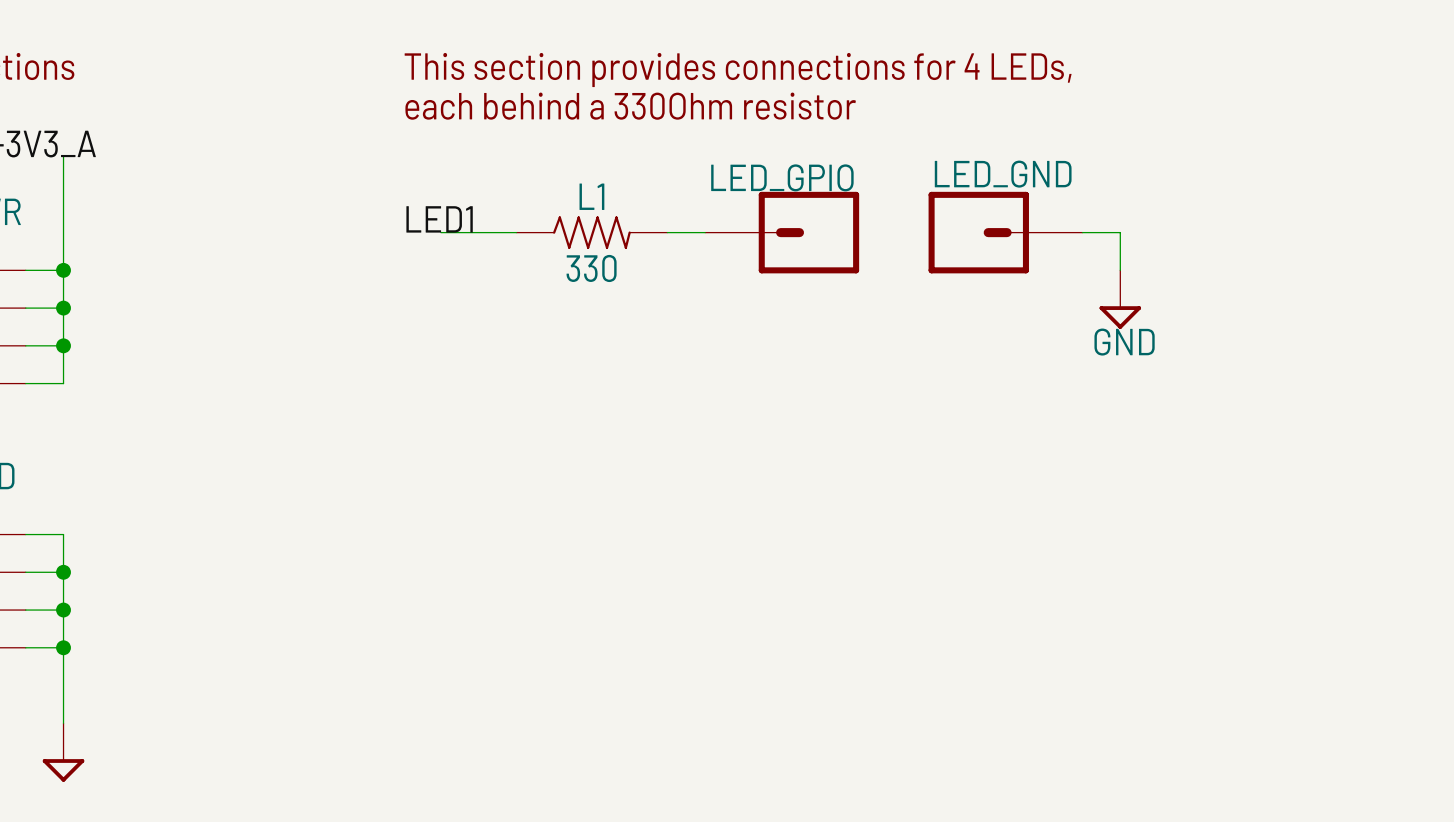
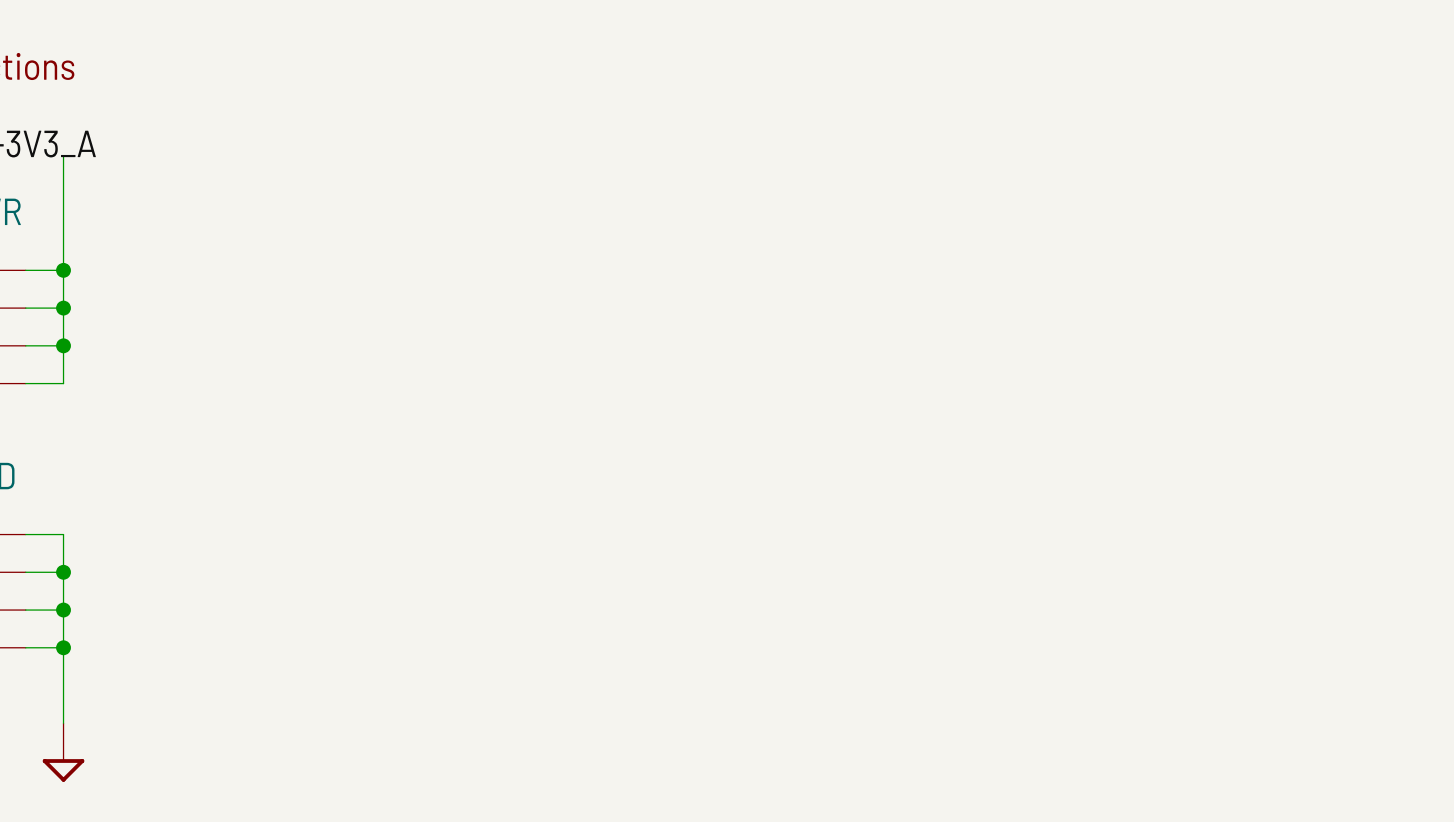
text: This section provides connections for 4 LEDs, (738, 70) -> none
text: each behind a 330Ohm resistor (630, 106) -> none
label: LED1 (439, 219) -> none
wire: (440, 232) (516, 232) -> none
L1: 330 (591, 232) -> none
wire: (667, 232) (705, 232) -> none
LED_GPIO: (782, 232) -> none
LED_GND: (1005, 232) -> none
wire: (1082, 232) (1120, 232) (1120, 270) -> none
power symbol: GND (1120, 299) -> none

